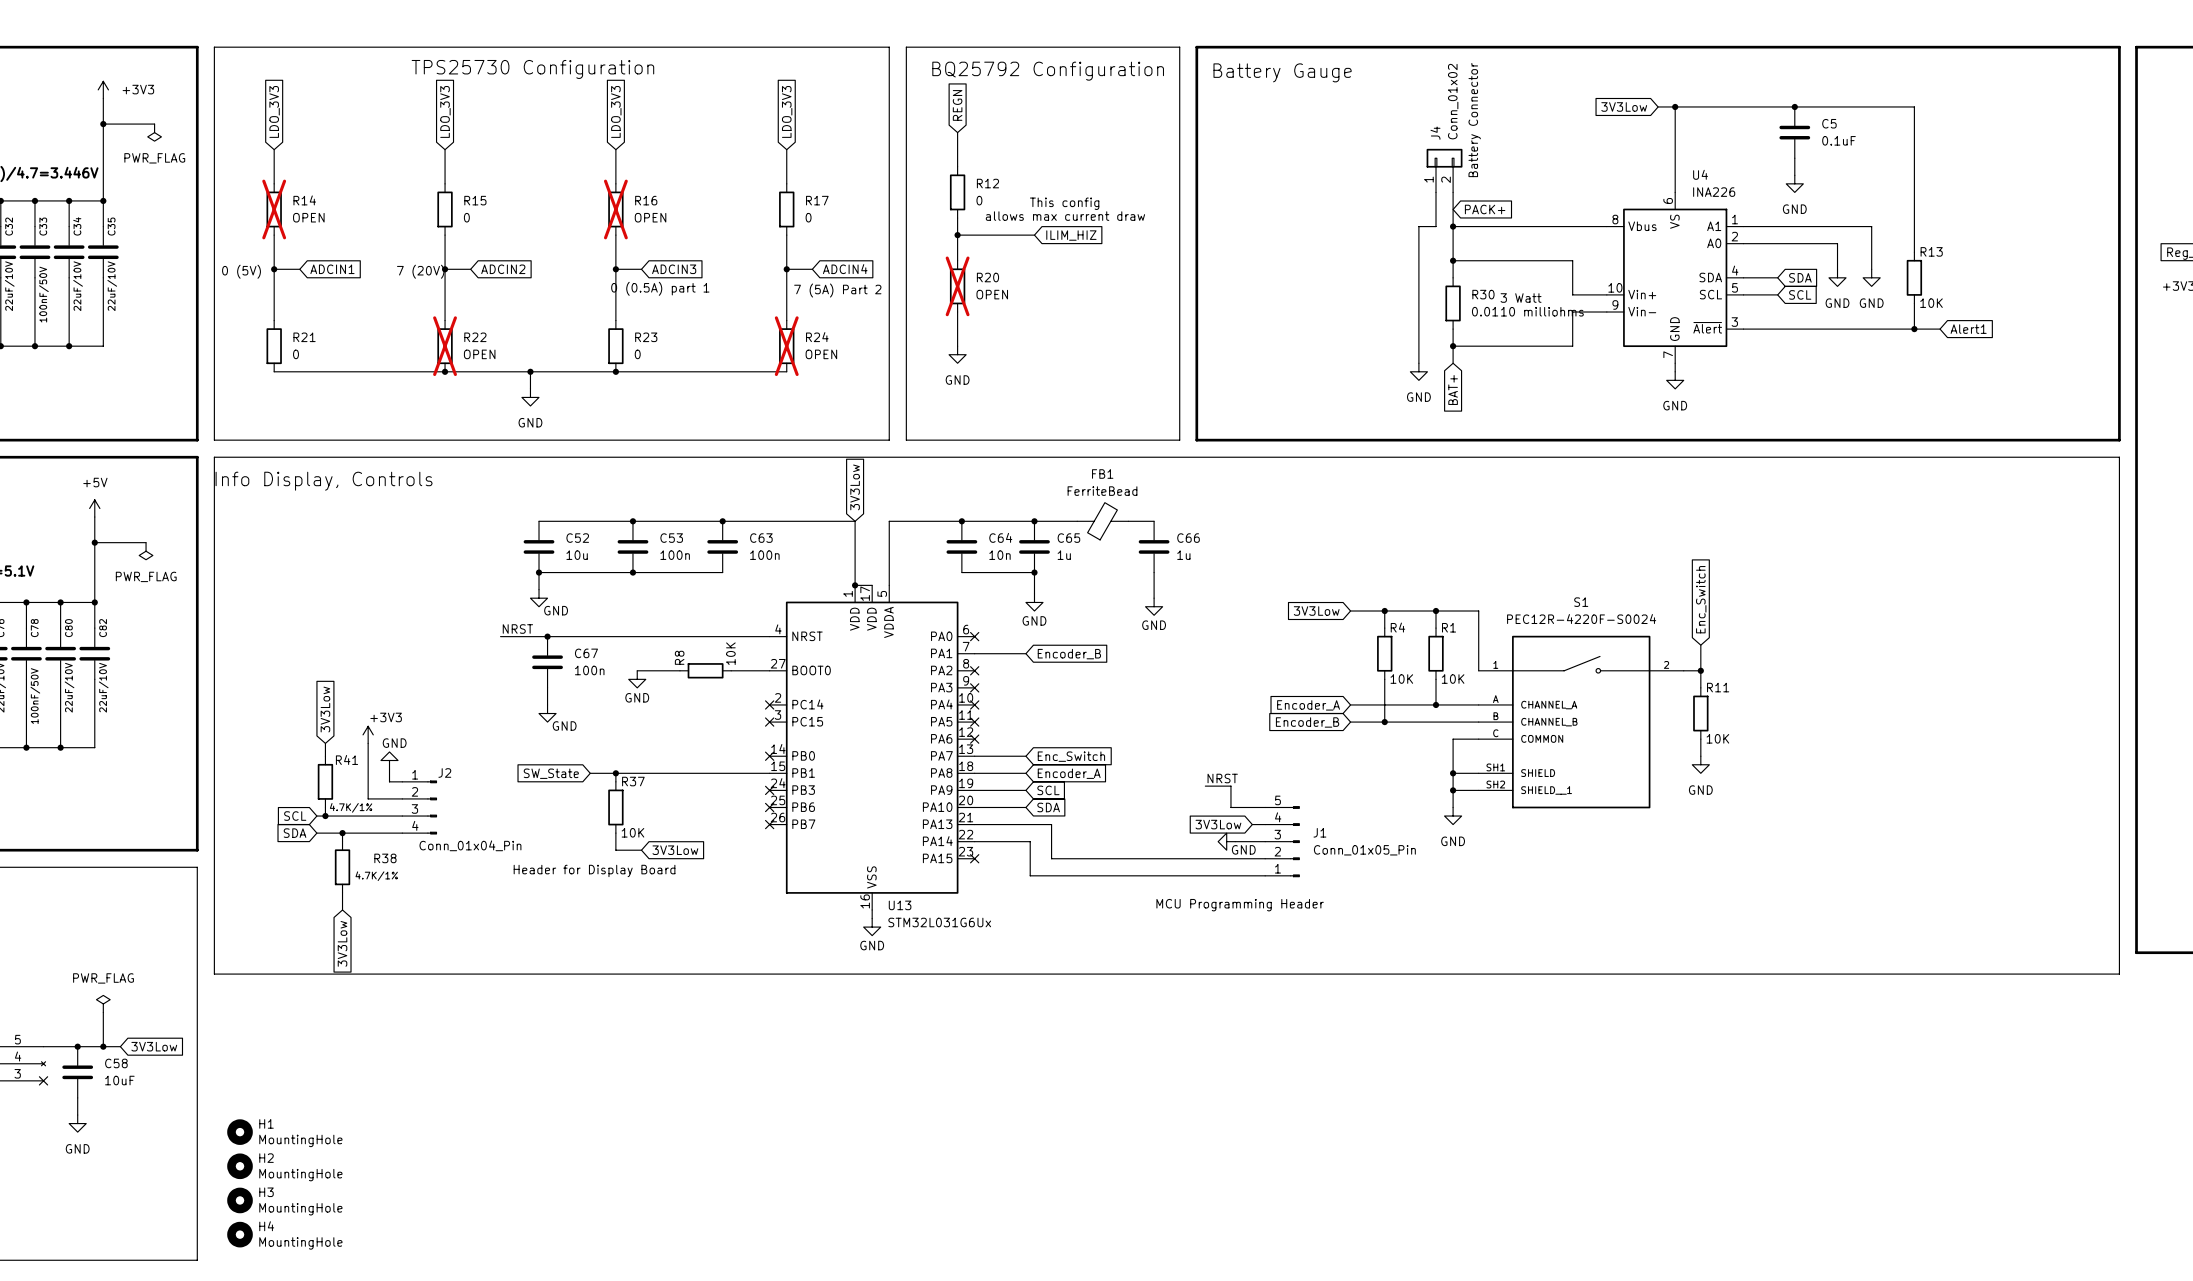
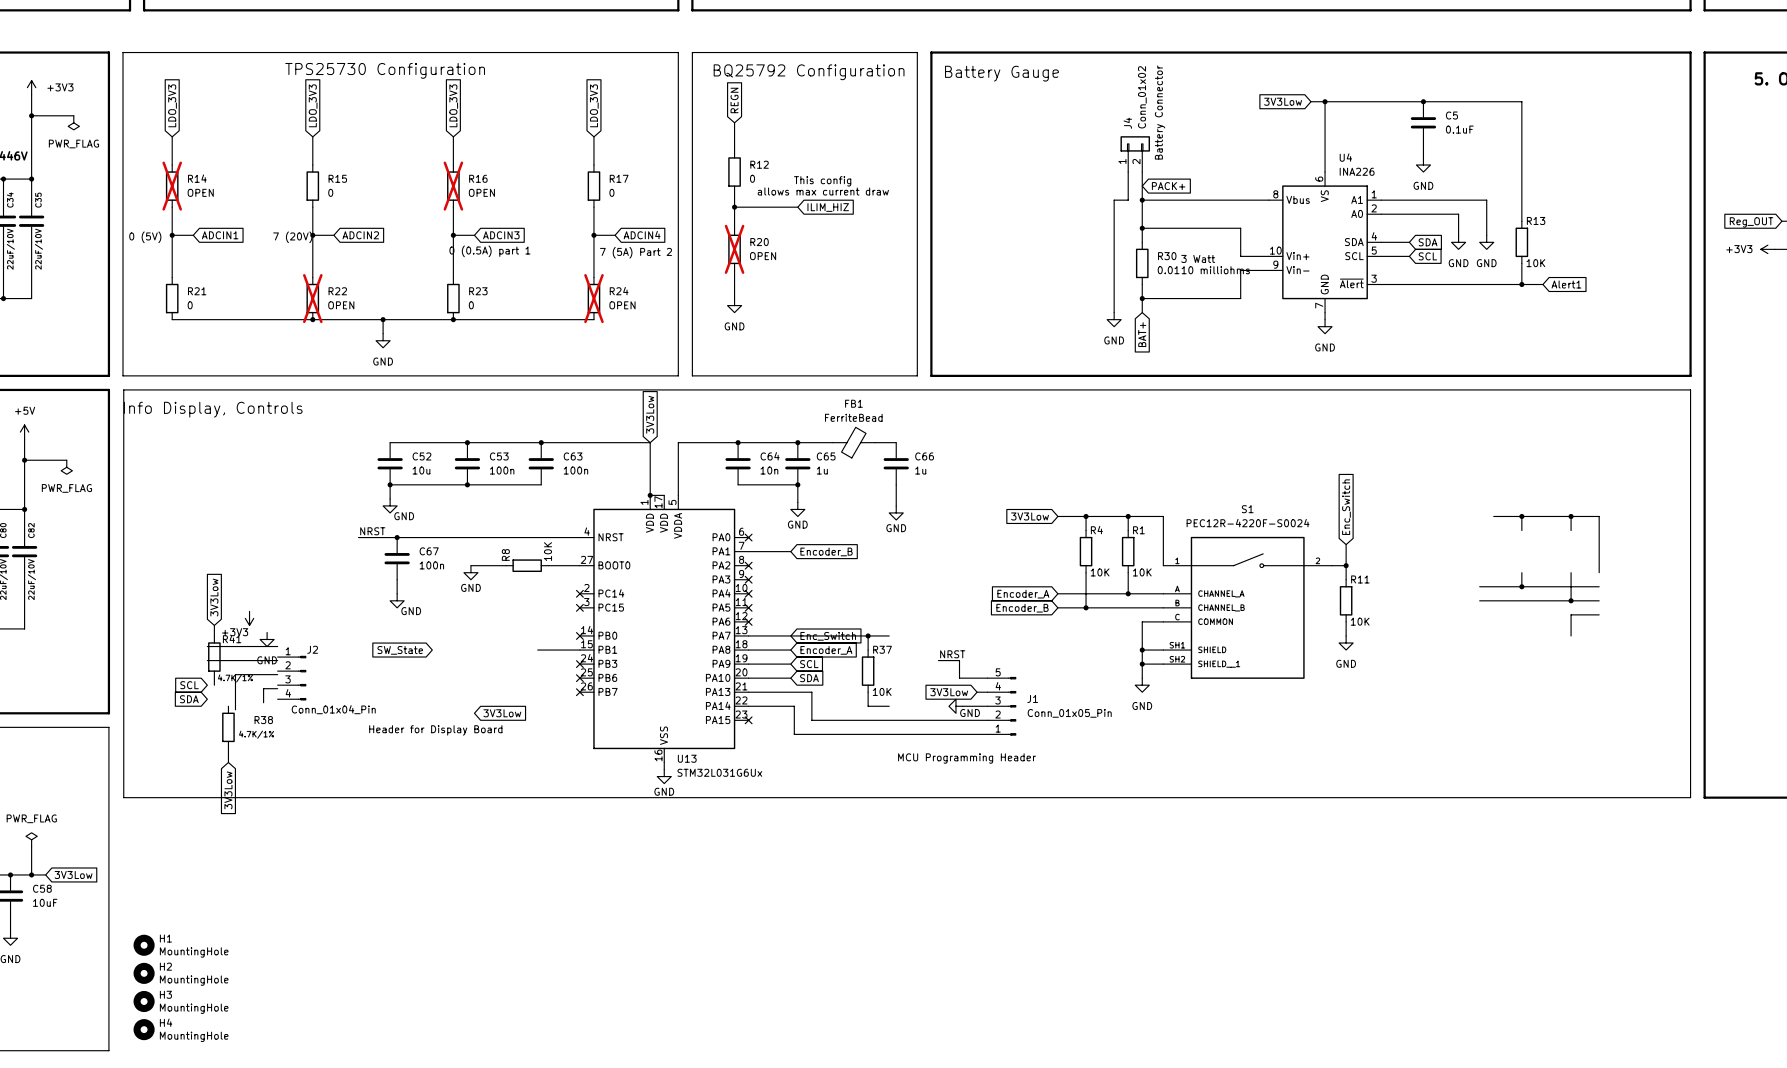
line: (215, 457) (214, 974) (2119, 974) (2119, 952) -> (123, 389) (123, 797) (1690, 797)
wire: none -> (1493, 516) (1599, 516) (1599, 572)
wire: none -> (1521, 516) (1521, 530)
junction: none -> (1521, 516)
wire: none -> (1571, 516) (1571, 530)
junction: none -> (1571, 516)
wire: none -> (1521, 572) (1521, 586)
wire: none -> (1571, 572) (1571, 600)
wire: none -> (1479, 586) (1599, 586)
junction: none -> (1521, 586)
wire: none -> (1479, 600) (1599, 600)
junction: none -> (1571, 600)
wire: none -> (1599, 614) (1571, 614) (1571, 635)
power symbol rotation: 0° (368, 734) -> 180° (249, 618)
wire: (368, 743) (368, 798) (402, 798) -> none
wire: none -> (790, 635) (889, 635)
wire: none -> (868, 635) (868, 650)
junction: none -> (868, 635)
power symbol rotation: 0° (389, 760) -> 180° (267, 639)
wire: (389, 769) (389, 781) (402, 781) -> none
wire: (590, 773) (718, 773) -> none
wire: (615, 773) (615, 781) -> none
junction: (615, 773) -> none
wire: none -> (277, 674) (235, 674) (235, 709)
R37 position: (615, 807) -> (868, 671)
wire: (316, 816) (402, 816) -> (207, 646) (277, 646)
junction: (325, 816) -> none
wire: none -> (277, 688) (263, 688) (263, 702)
wire: none -> (868, 692) (868, 706) (889, 706)
wire: (316, 833) (402, 833) -> (207, 660) (277, 660)
wire: (342, 833) (342, 841) -> none
junction: (342, 833) -> none
wire: (615, 833) (615, 850) (641, 850) -> none

